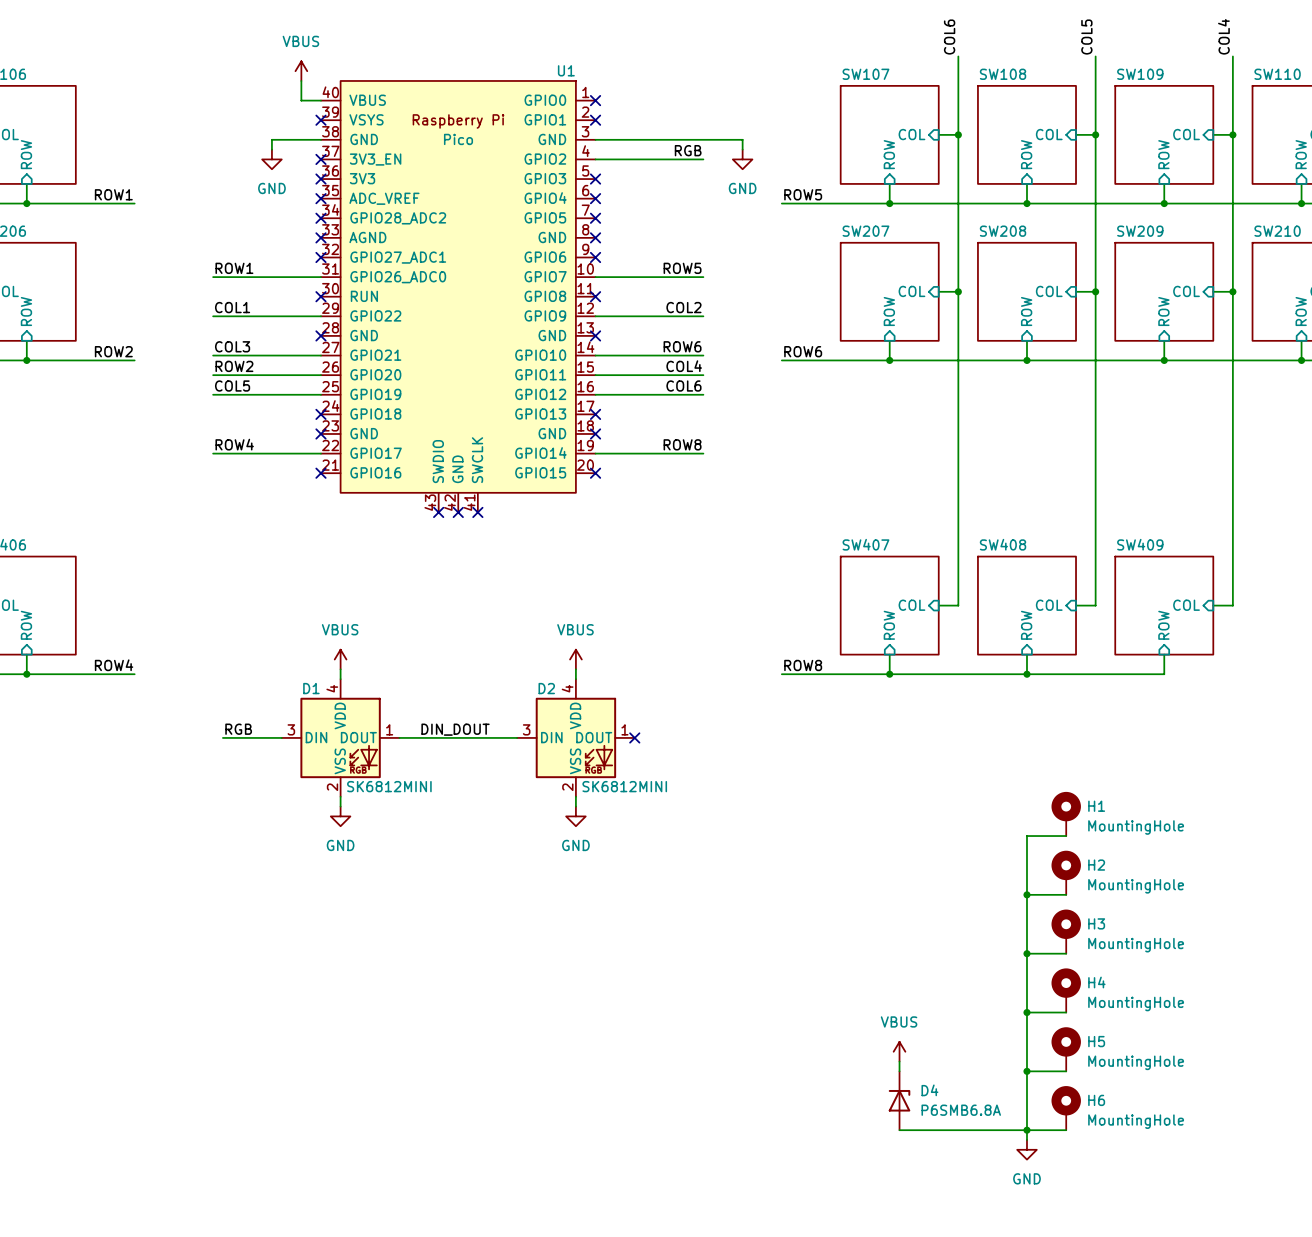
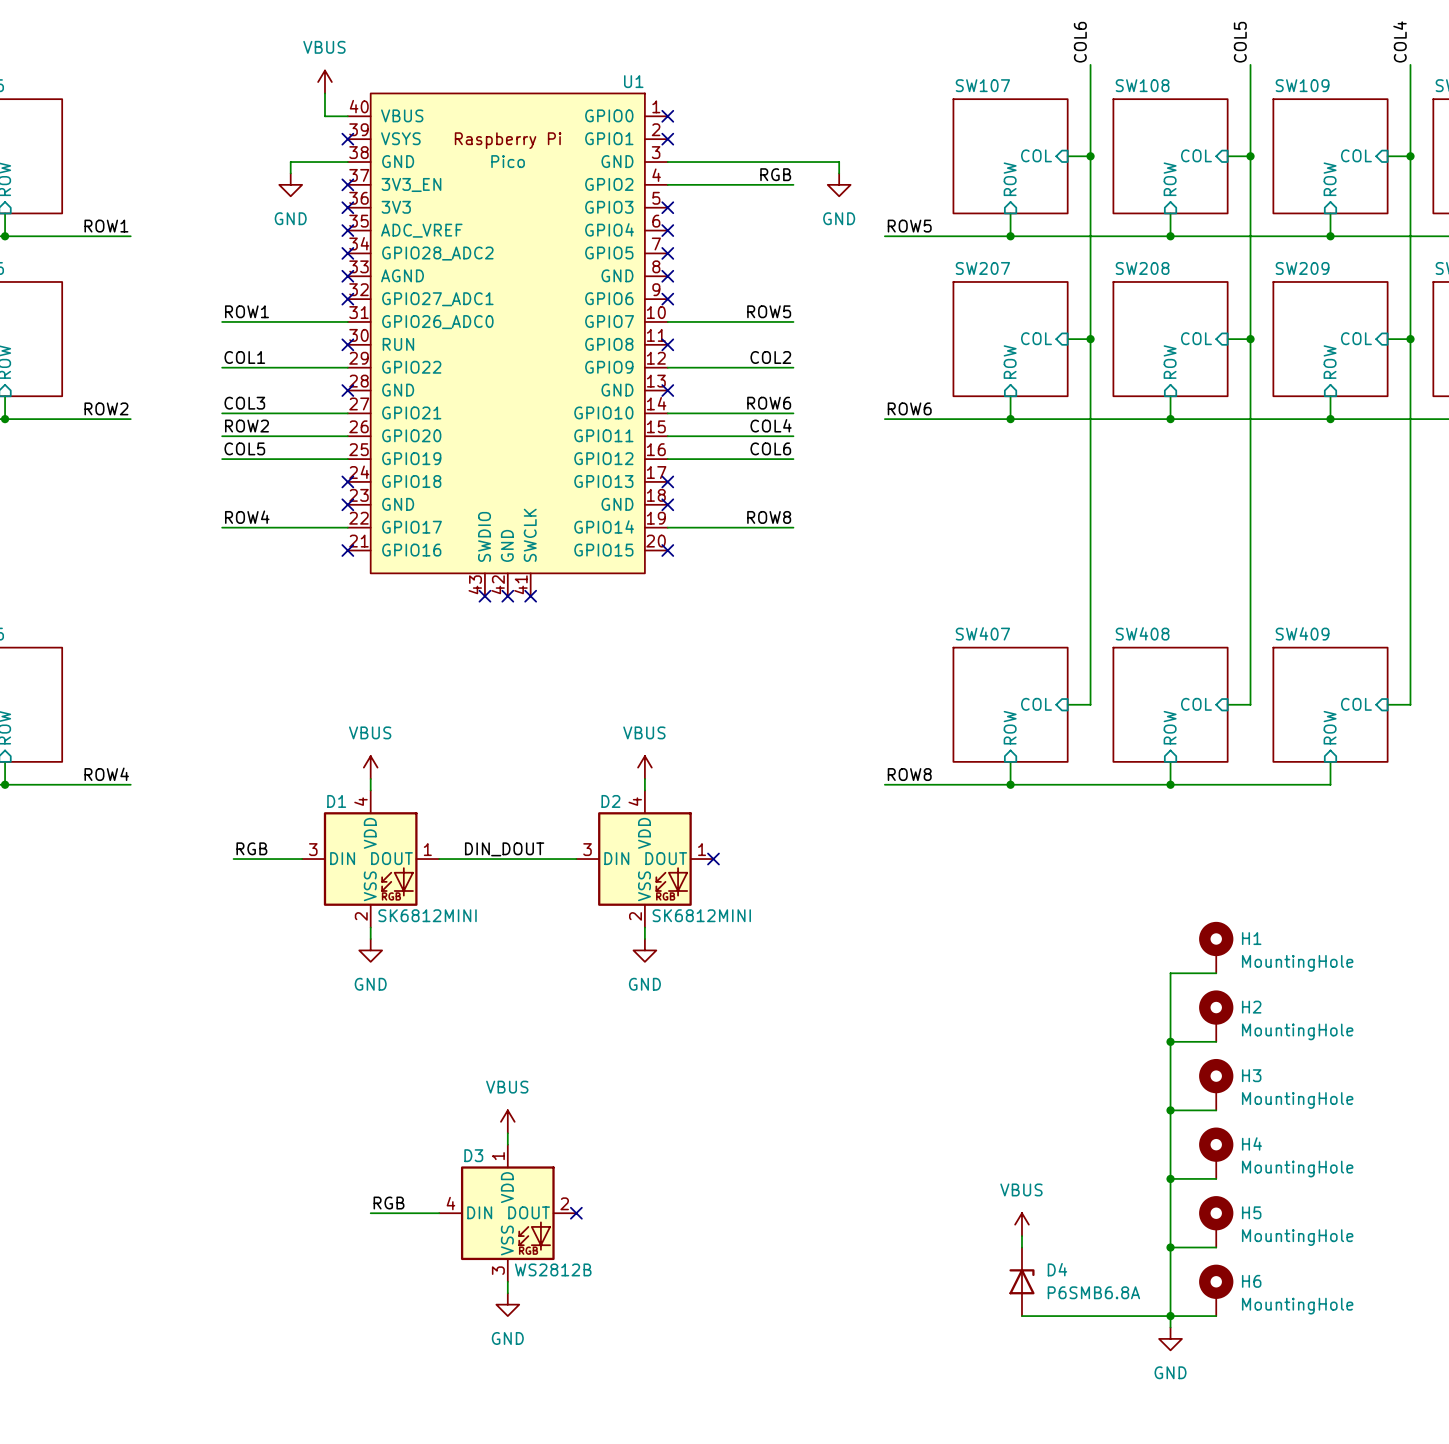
power symbol: none -> VBUS (507, 1121)
wire: none -> (507, 1133) (507, 1144)
label: none -> RGB (389, 1203)
wire: none -> (370, 1213) (439, 1213)
D3: none -> WS2812B (507, 1213)
no-connect mark: none -> (576, 1213)
wire: none -> (507, 1281) (507, 1293)
power symbol: none -> GND (507, 1304)

